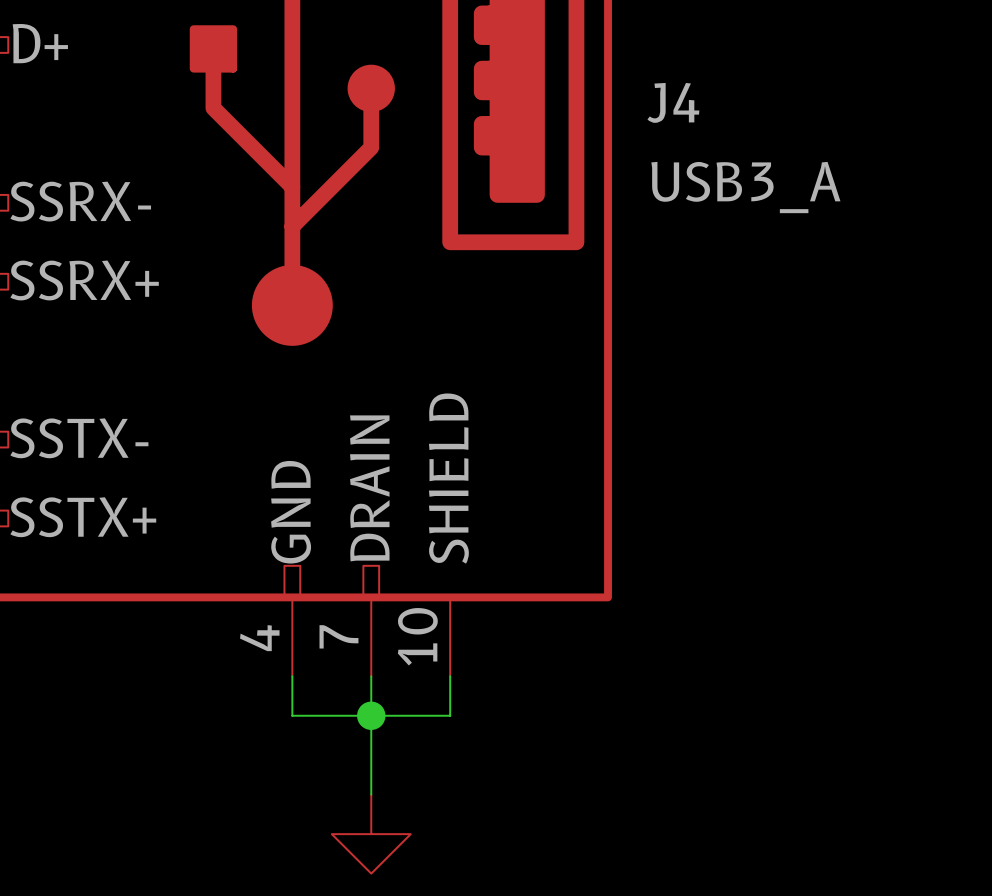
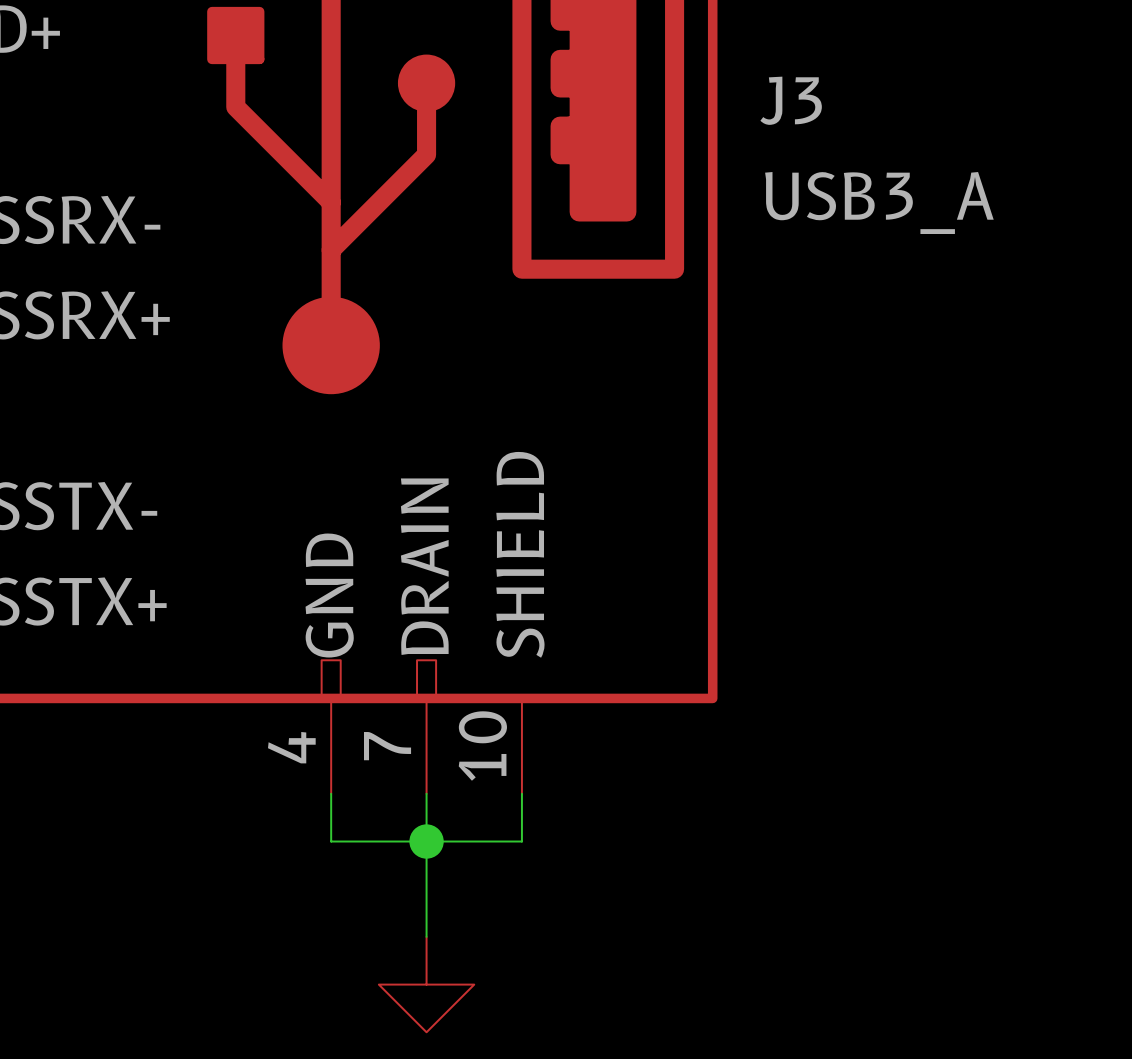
J4 name: J4 (673, 102) -> J3 (791, 100)

